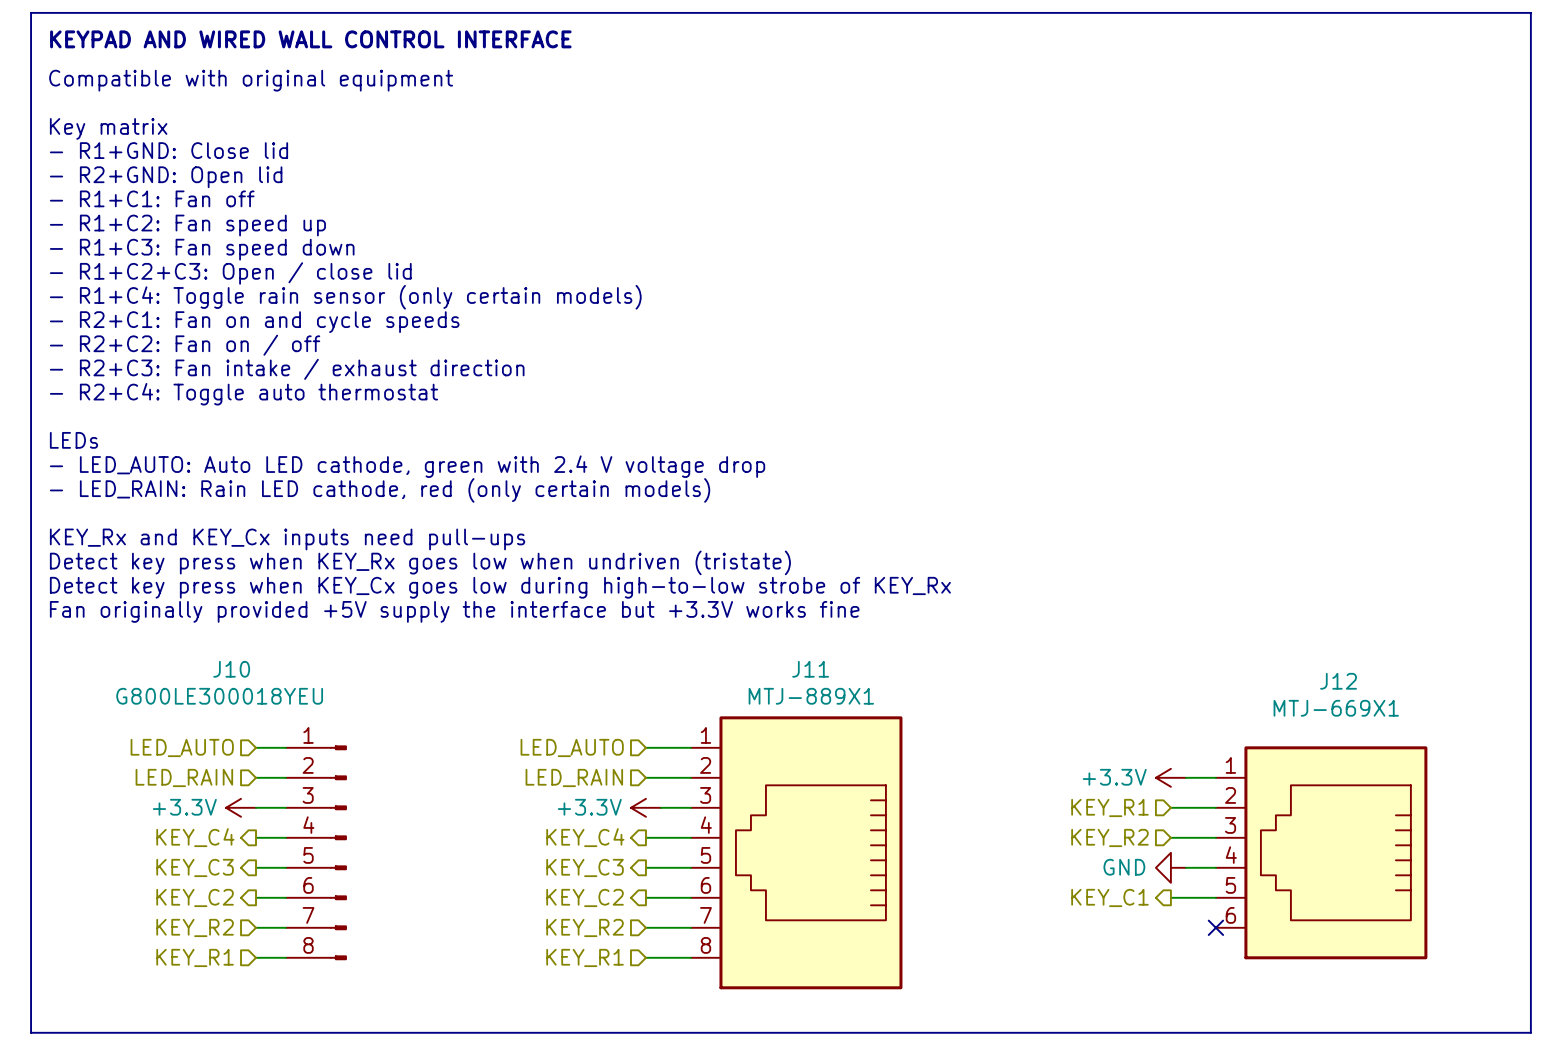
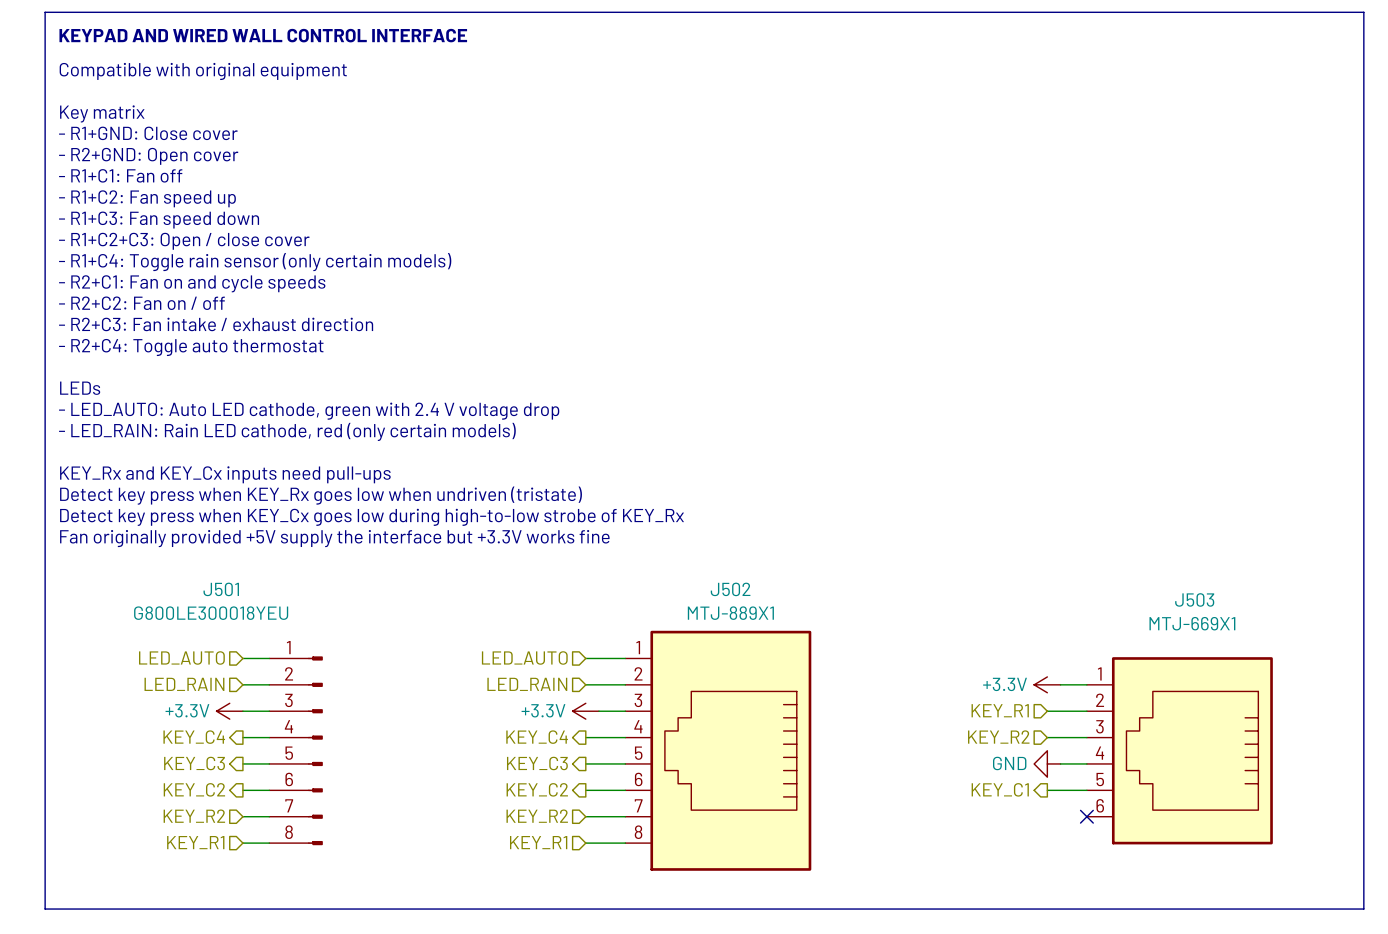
text: - R1+GND: Close lid (168, 150) -> - R1+GND: Close cover (148, 133)
text: - R2+GND: Open lid (166, 177) -> - R2+GND: Open cover (148, 156)
text: - R1+C2+C3: Open / close lid (230, 273) -> - R1+C2+C3: Open / close cover (184, 241)
J10 name: J10 (231, 669) -> J501 (221, 589)
J11 name: J11 (810, 669) -> J502 (730, 589)
J12 name: J12 (1338, 681) -> J503 (1194, 599)

